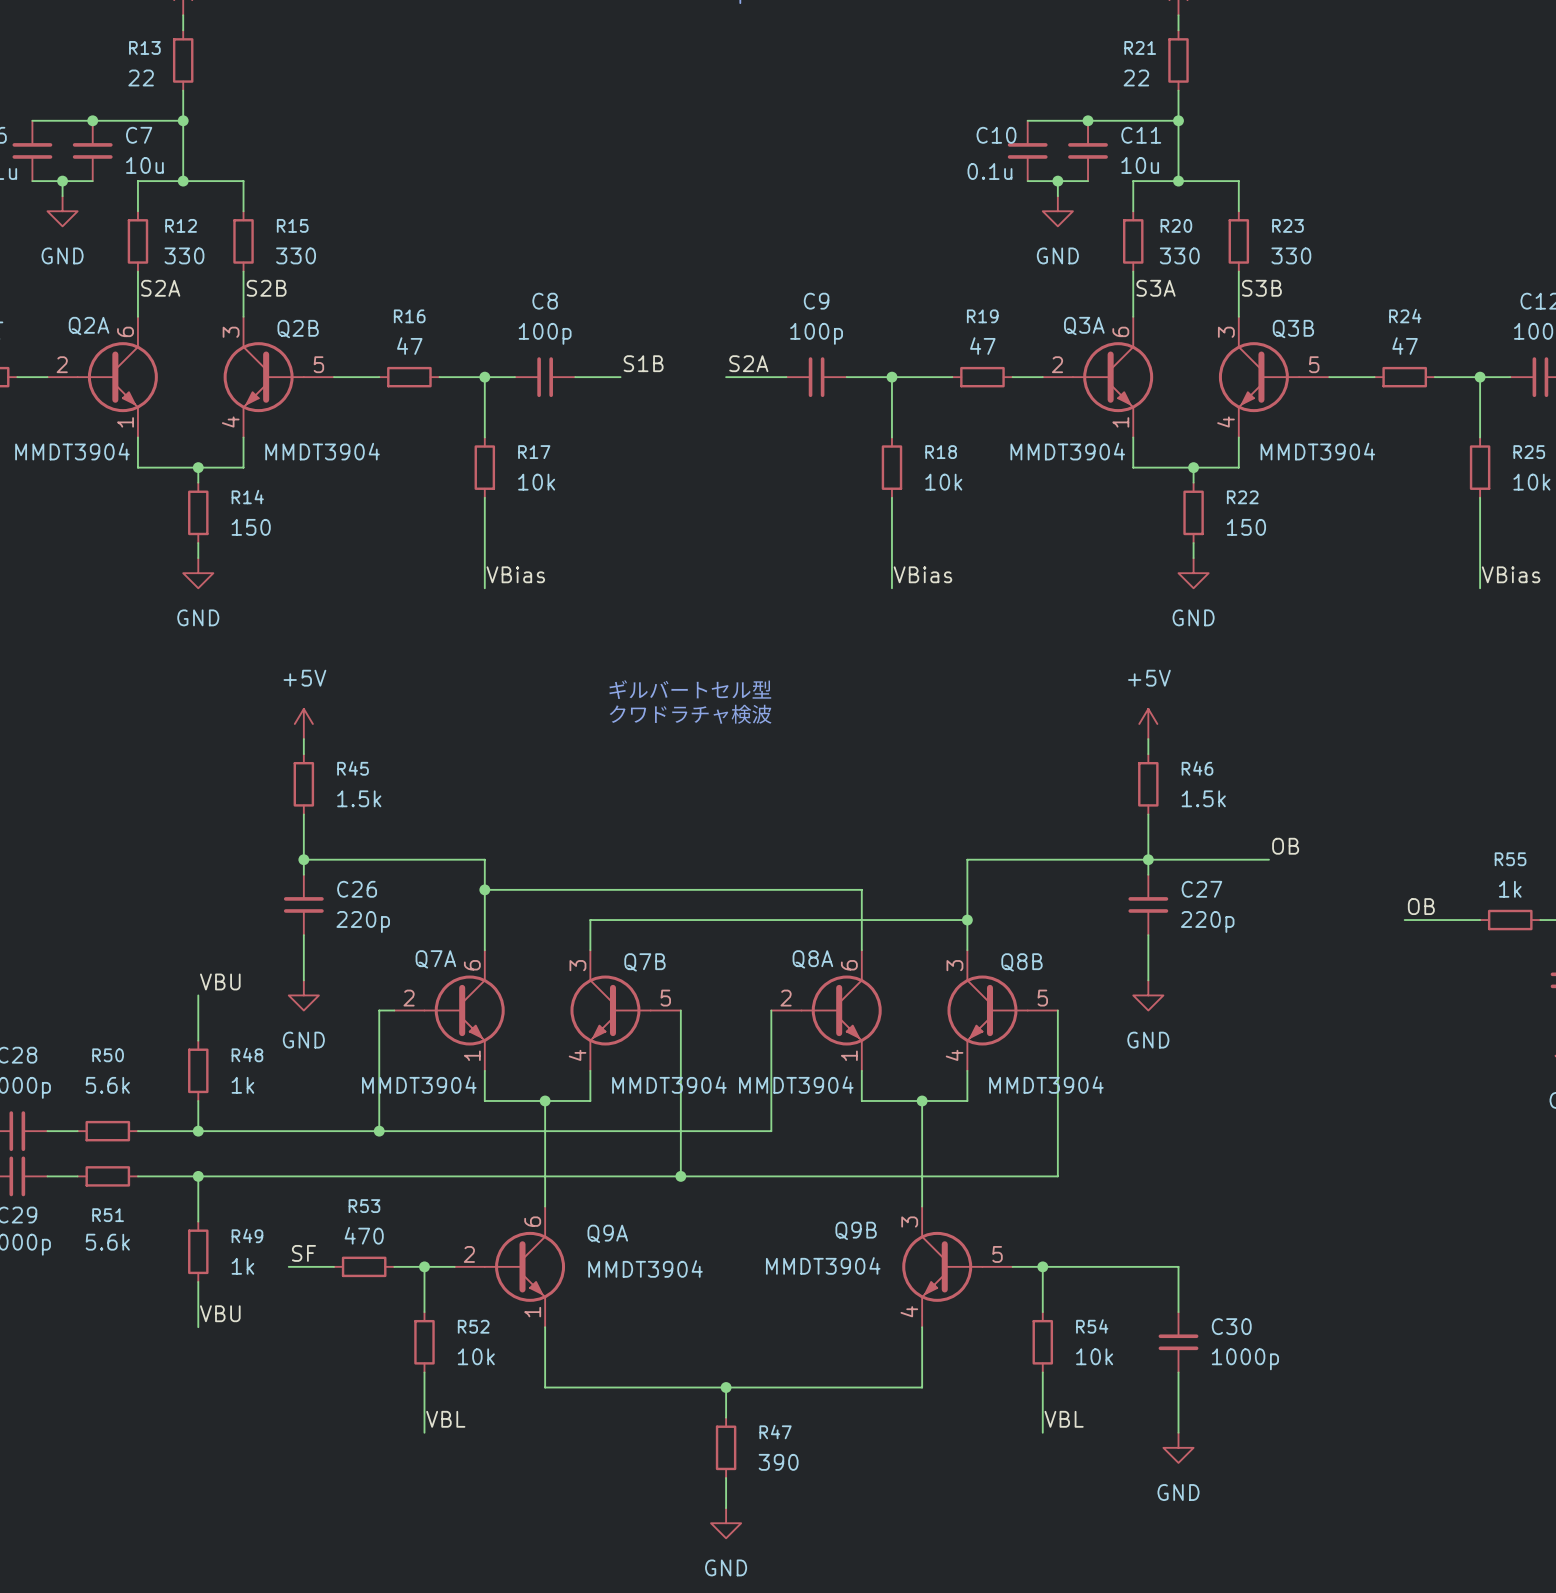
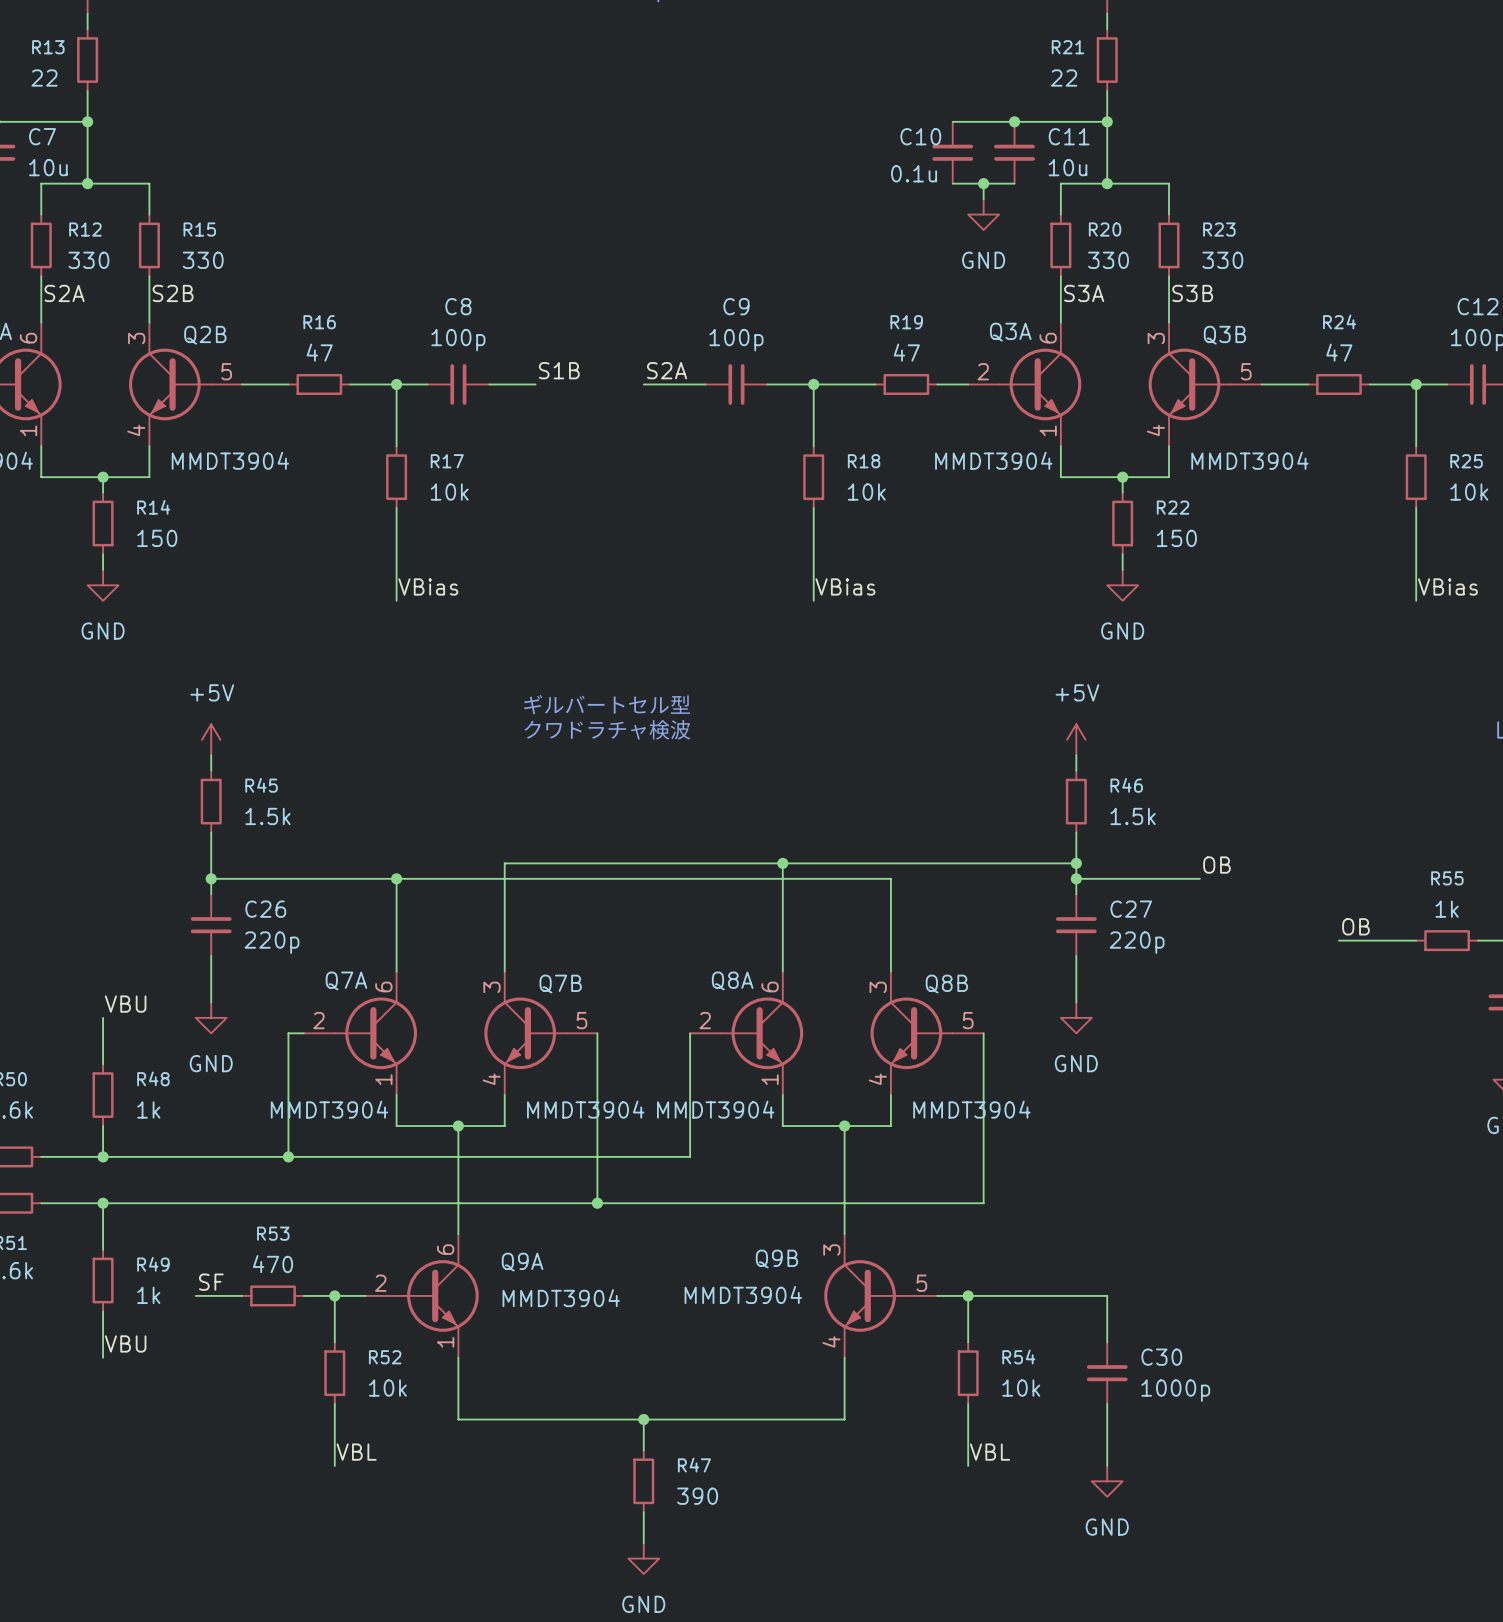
junction: none -> (782, 863)
junction: none -> (1076, 863)
wire: (967, 859) (1148, 859) -> (890, 878) (396, 878)
wire: (484, 889) (861, 889) -> (782, 863) (782, 909)
junction position: (484, 889) -> (396, 878)
wire: (590, 920) (967, 920) -> (504, 940) (504, 863) (1076, 863)
junction: (967, 920) -> none

